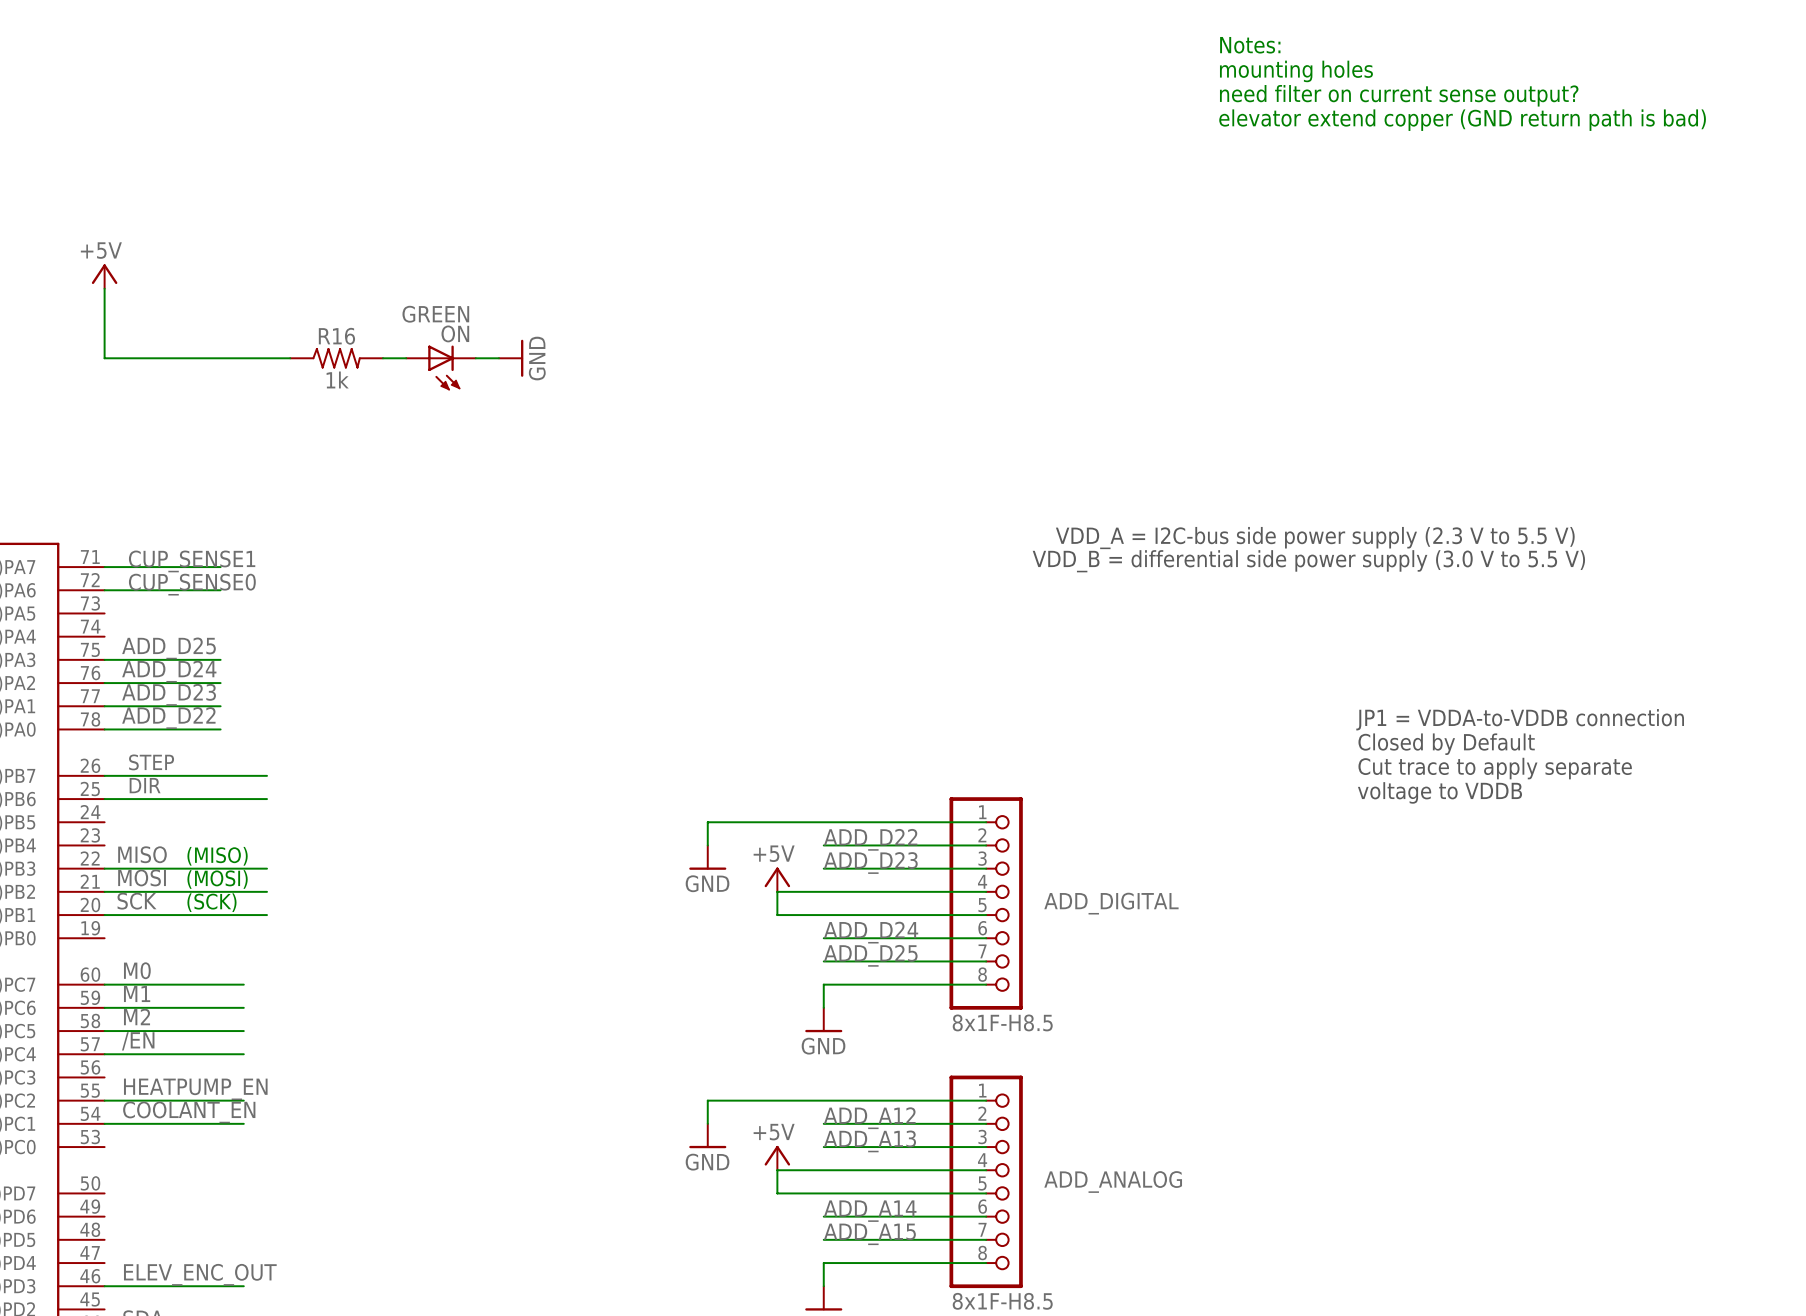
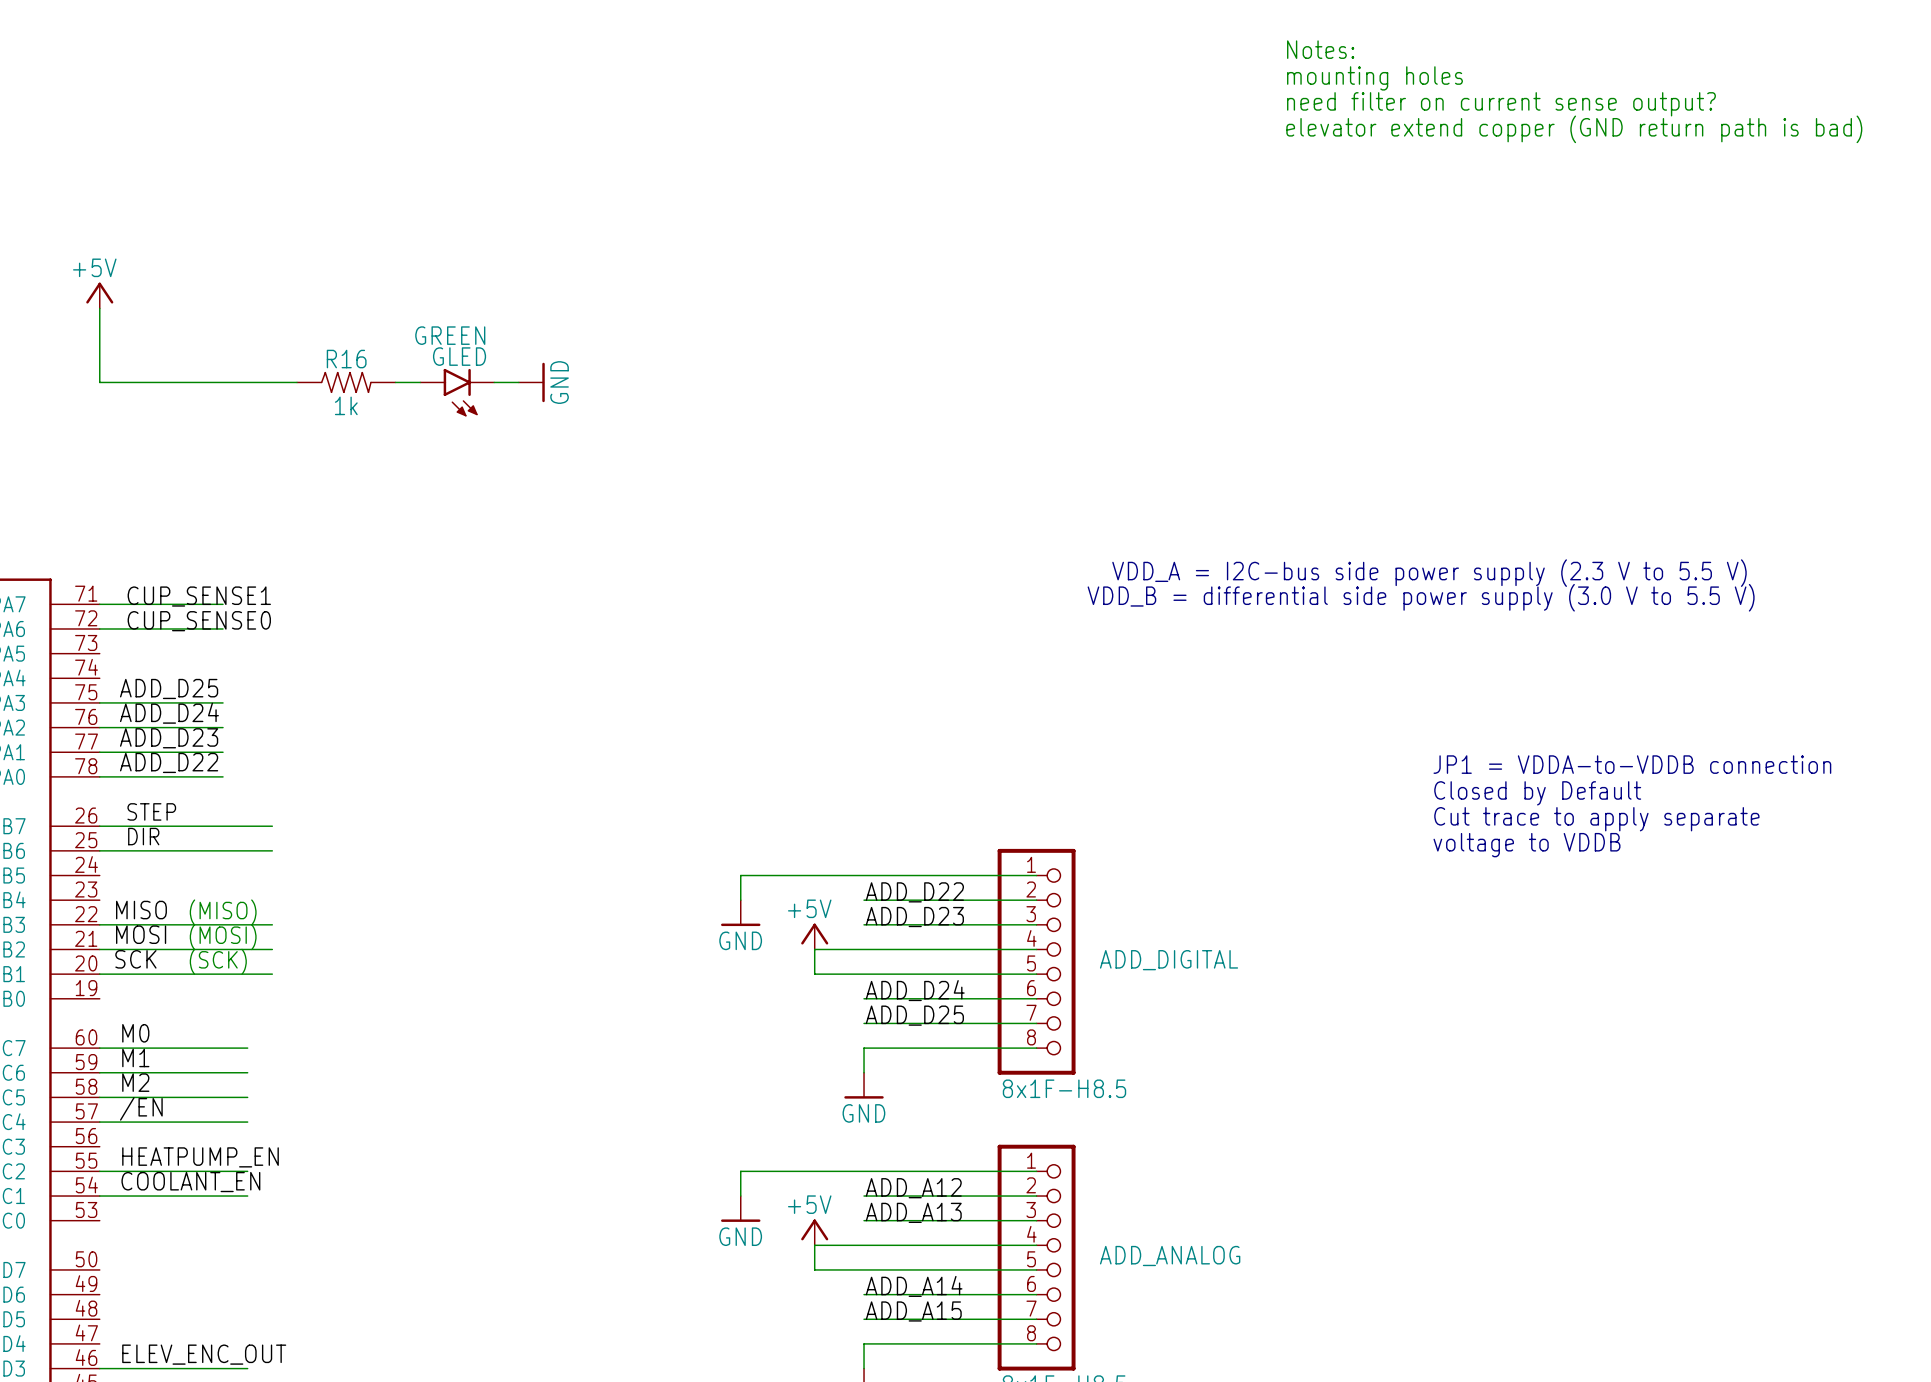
ON: GREEN (440, 367) -> none
GLED: none -> GREEN (457, 392)

